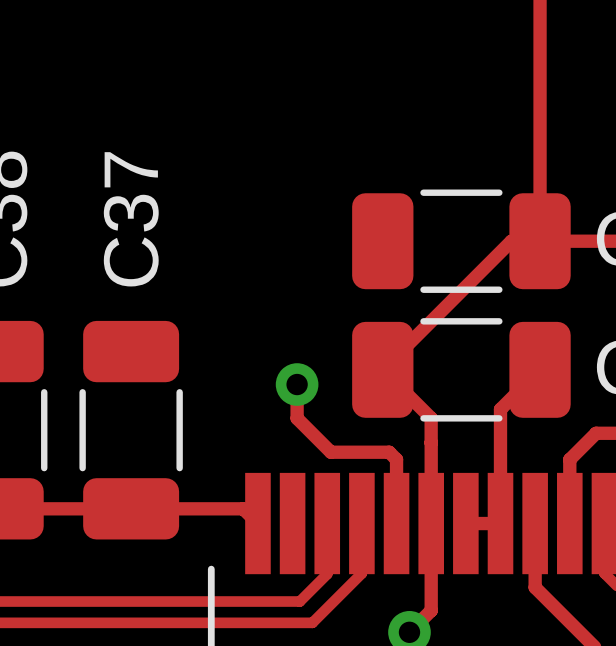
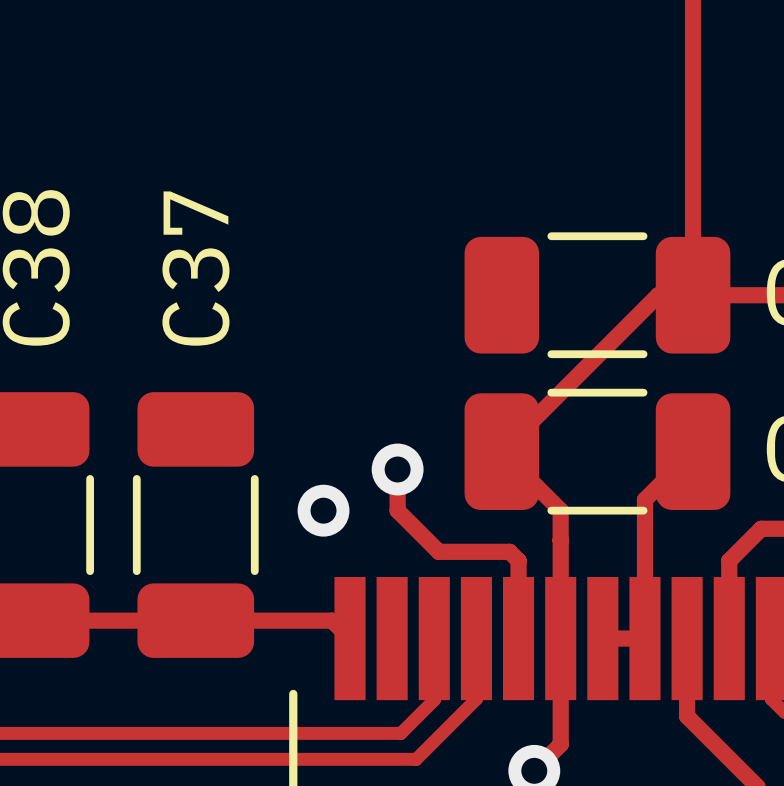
via: none -> (323, 510)

